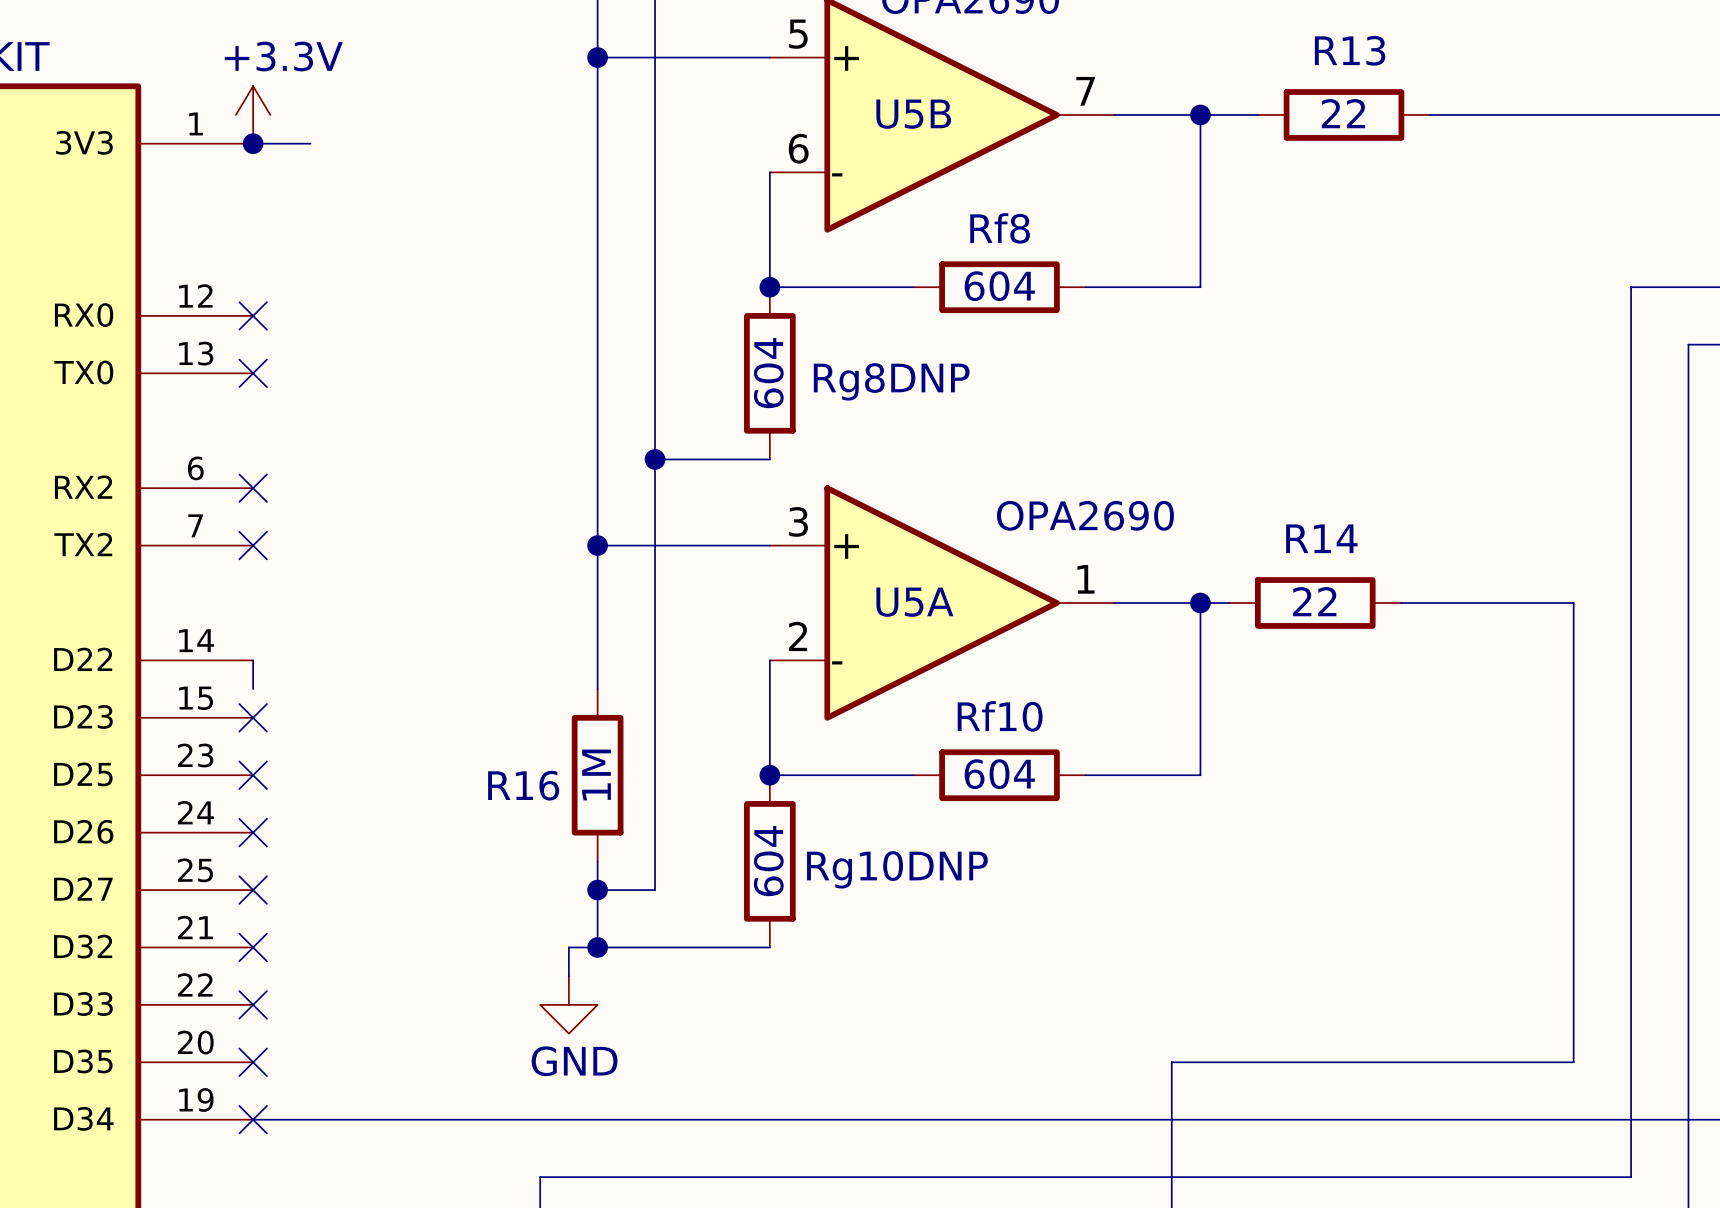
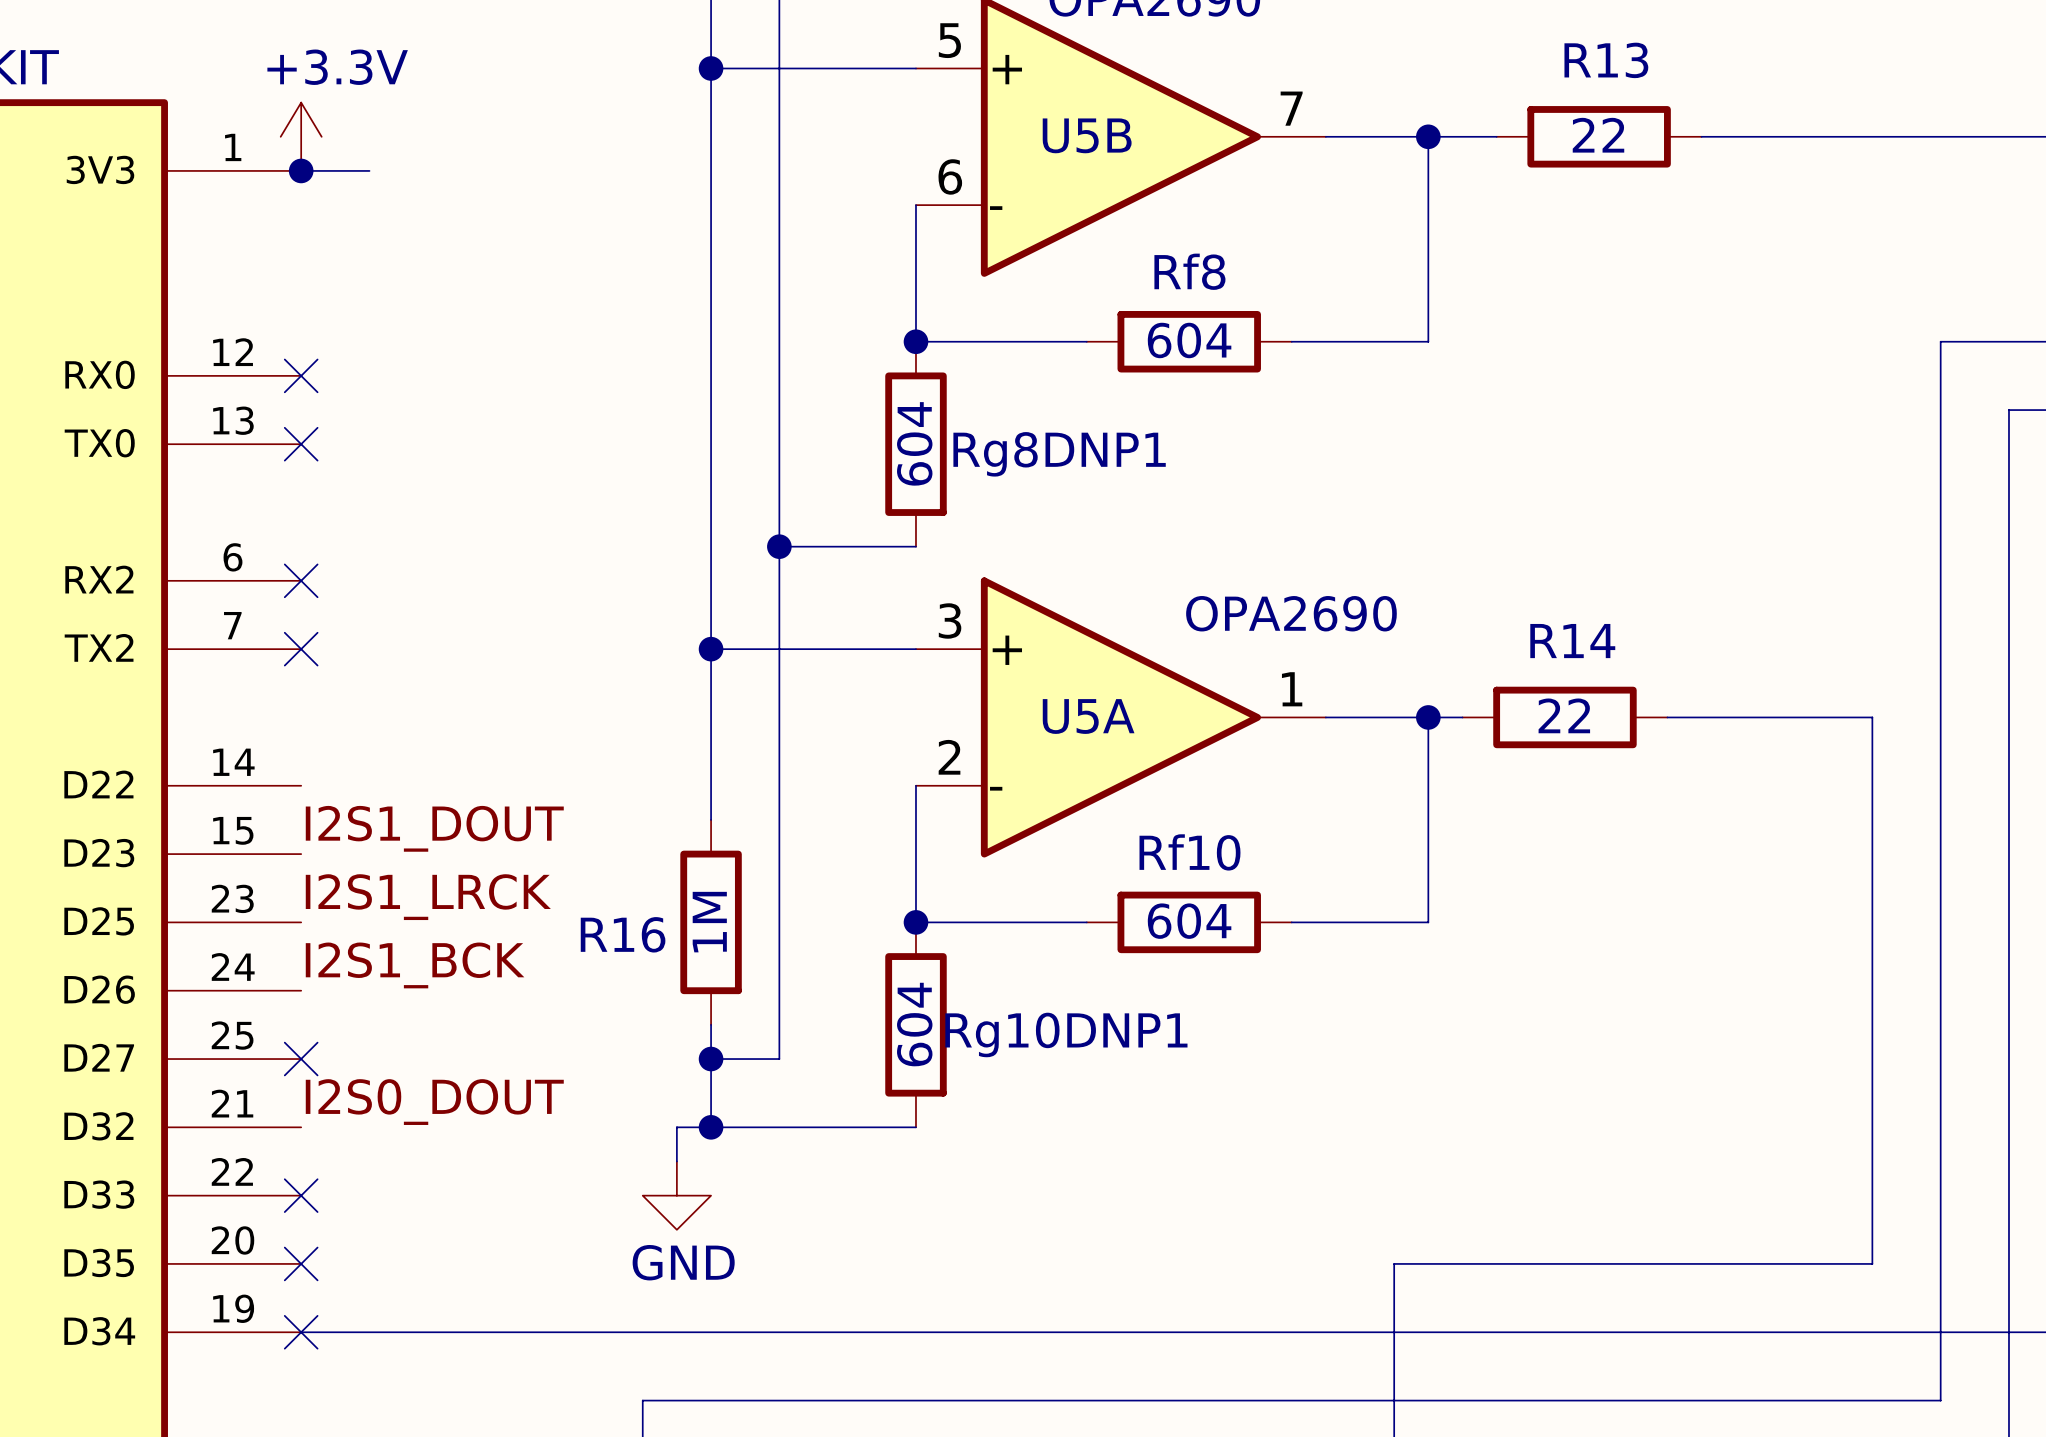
Rg8DNP name: Rg8DNP (891, 381) -> Rg8DNP1 (1059, 454)
wire: (253, 660) (253, 689) -> none
label: none -> I2S1_DOUT (434, 828)
no-connect mark: (253, 717) -> none
label: none -> I2S1_LRCK (428, 897)
no-connect mark: (253, 775) -> none
label: none -> I2S1_BCK (415, 965)
no-connect mark: (253, 832) -> none
Rg10DNP name: Rg10DNP (897, 869) -> Rg10DNP1 (1066, 1034)
label: none -> I2S0_DOUT (434, 1102)
no-connect mark: (253, 947) -> none

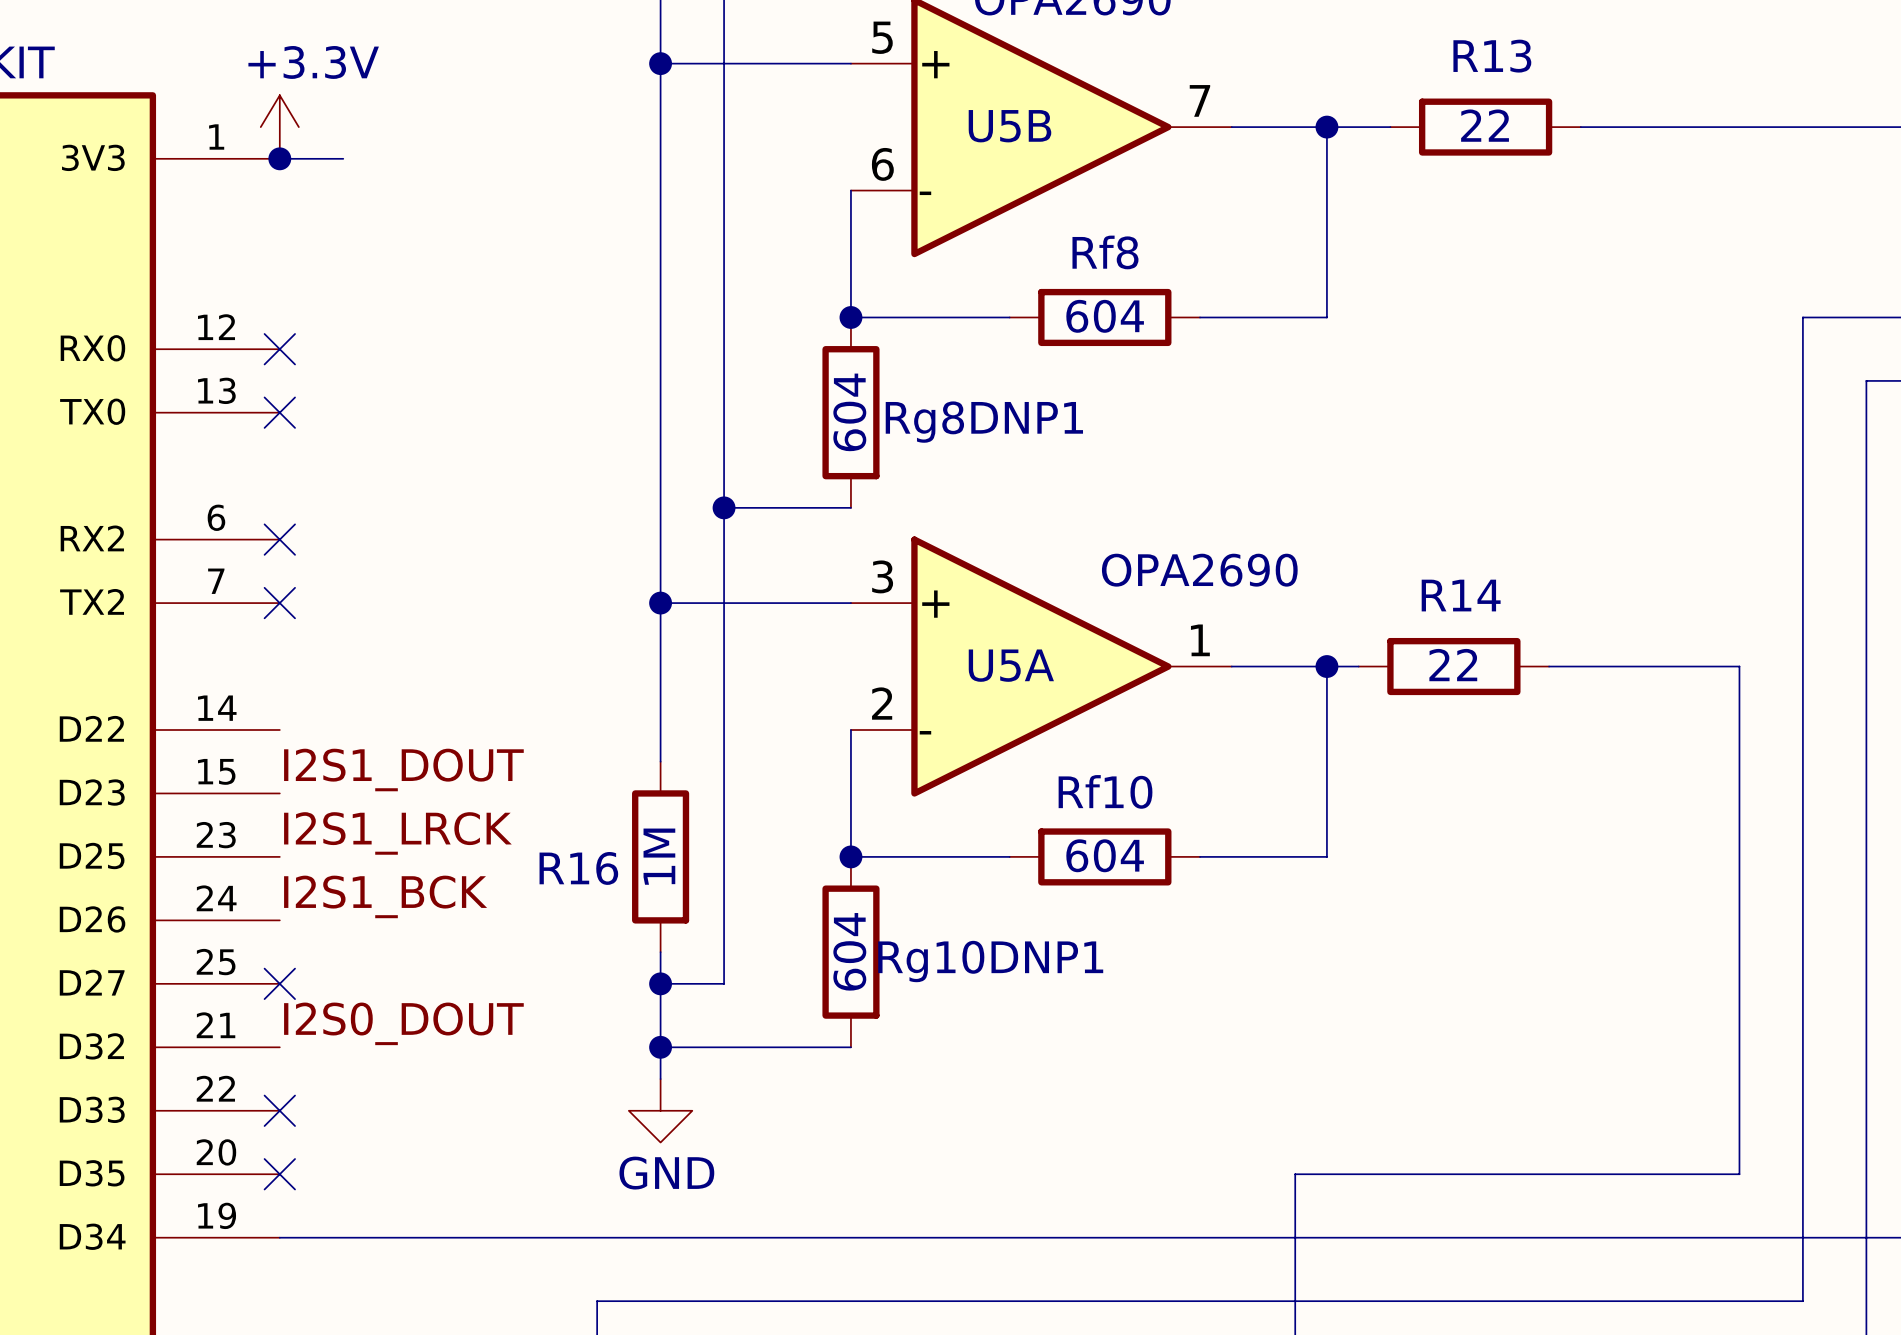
wire: (711, 1127) (676, 1127) (676, 1161) -> (660, 1047) (660, 1079)
power symbol position: GND (676, 1195) -> GND (660, 1110)
no-connect mark: (301, 1332) -> none

